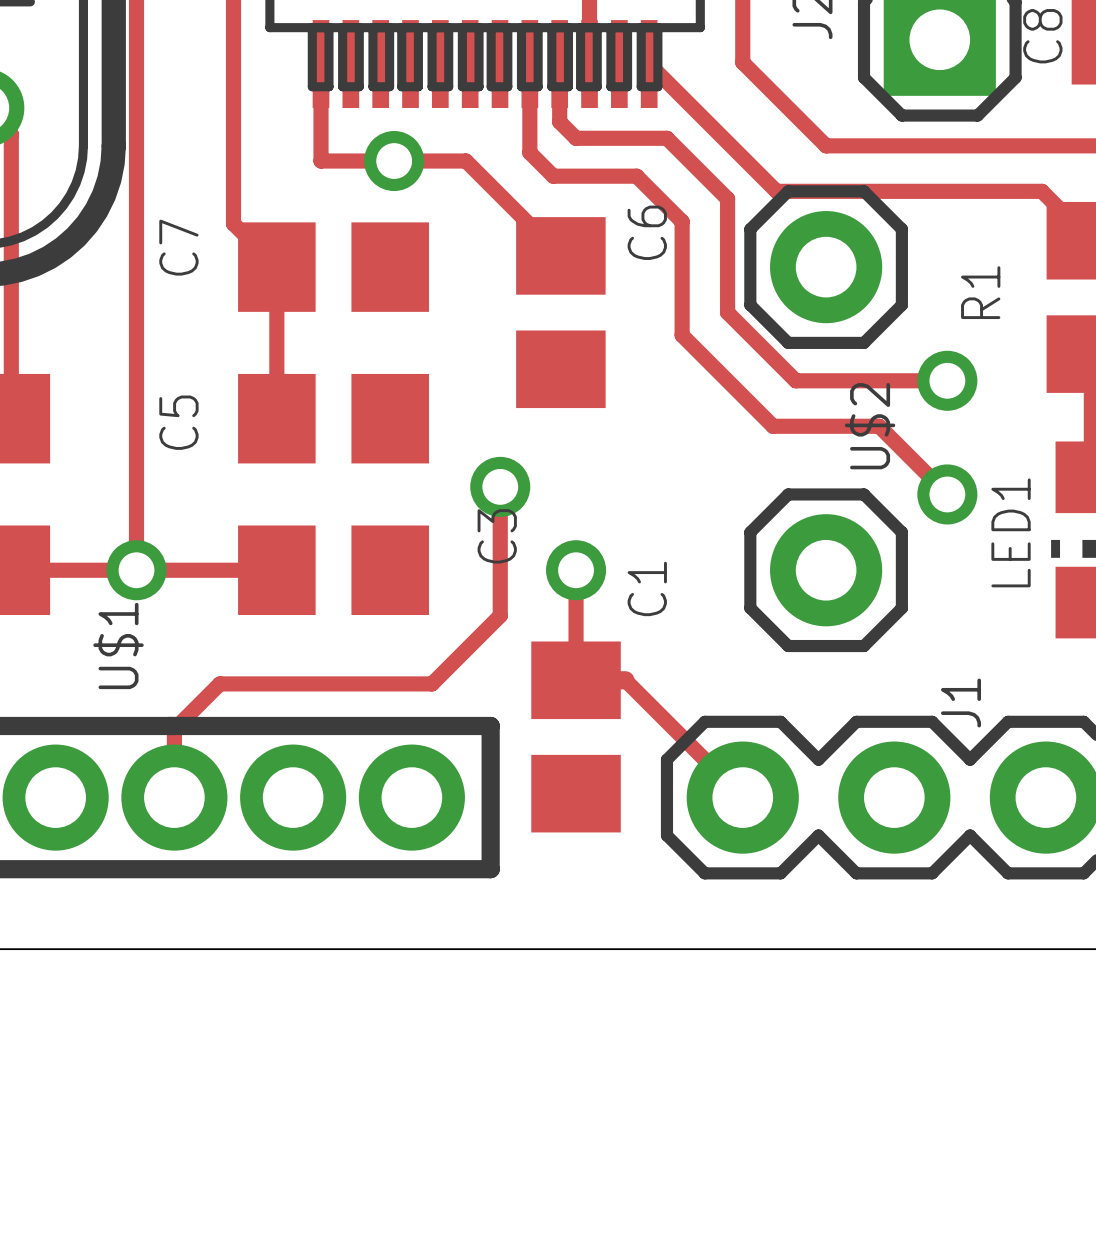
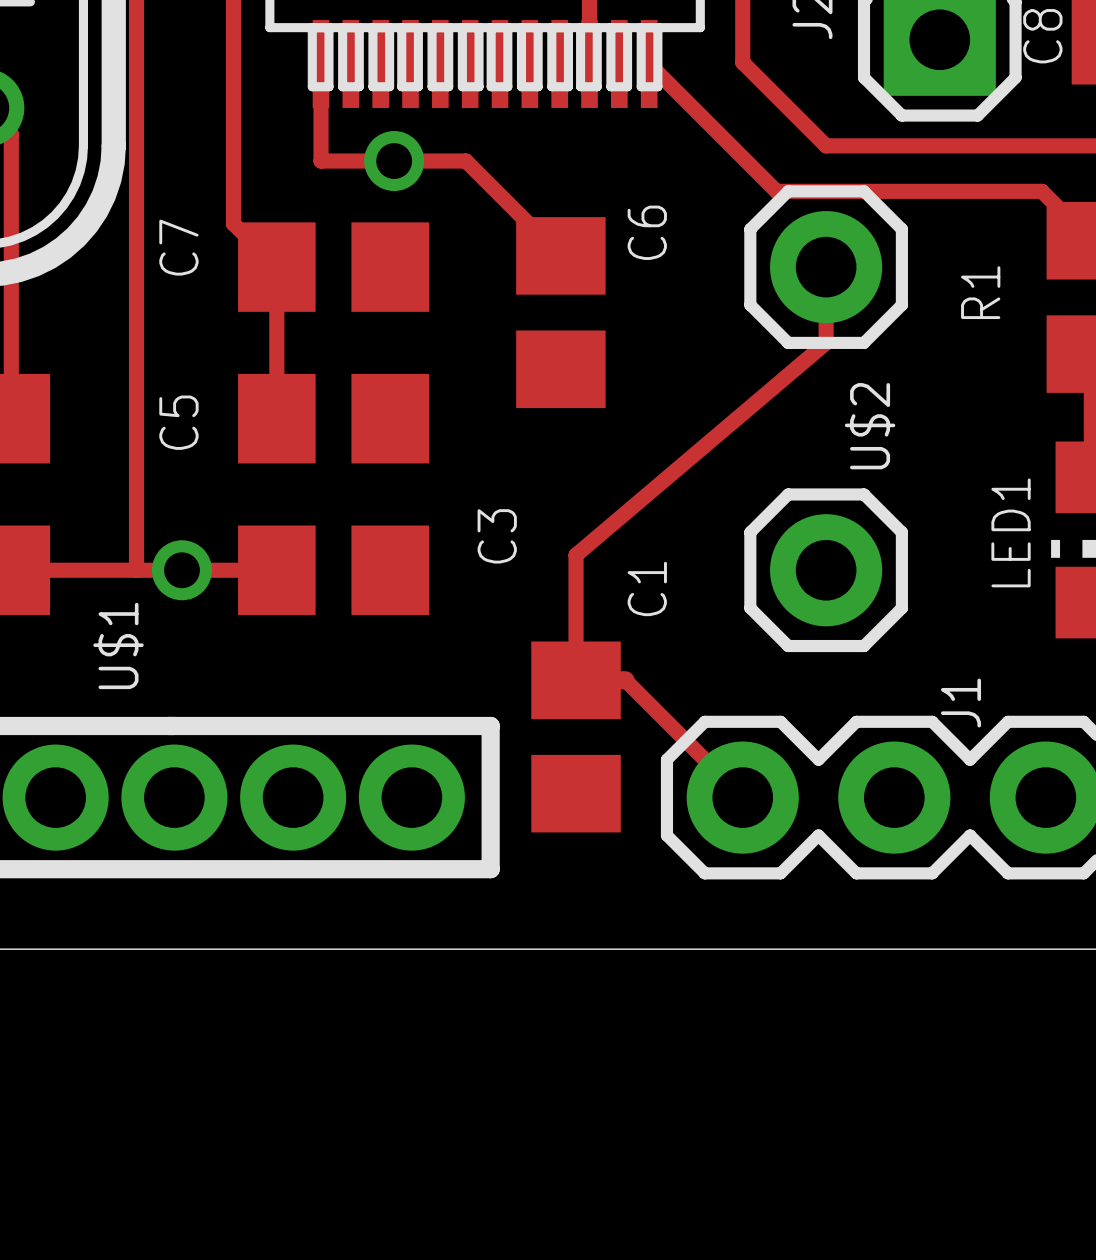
track: (529, 64) (529, 152) (553, 176) (636, 176) (682, 221) (682, 335) (773, 426) (879, 426) (947, 494) -> none
track: (559, 64) (559, 121) (576, 138) (666, 138) (727, 198) (727, 312) (795, 380) (947, 380) -> none
track: none -> (826, 267) (826, 342) (576, 555) (576, 570)
via: (947, 380) -> none
track: (500, 486) (500, 615) (432, 683) (219, 683) (174, 729) (174, 797) -> none
via: (500, 486) -> none
via: (947, 494) -> none
via position: (136, 570) -> (181, 570)
via: (576, 570) -> none

